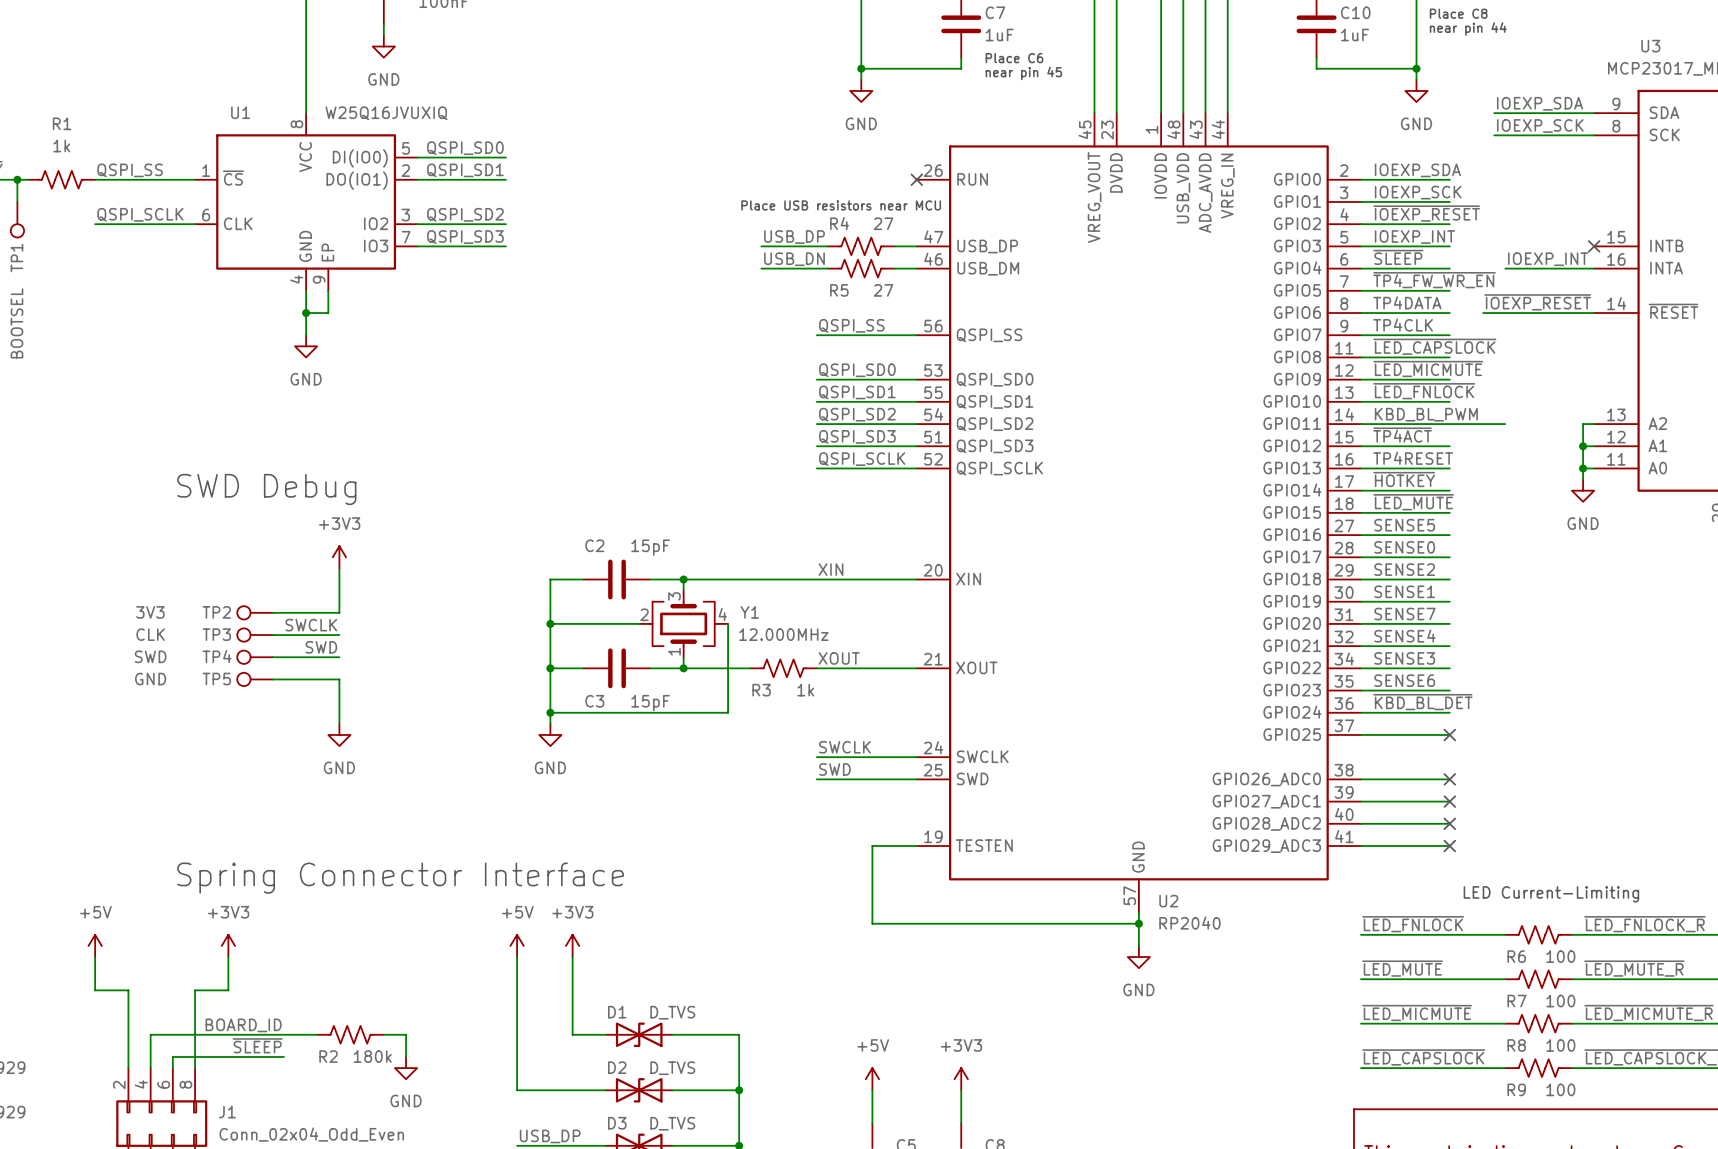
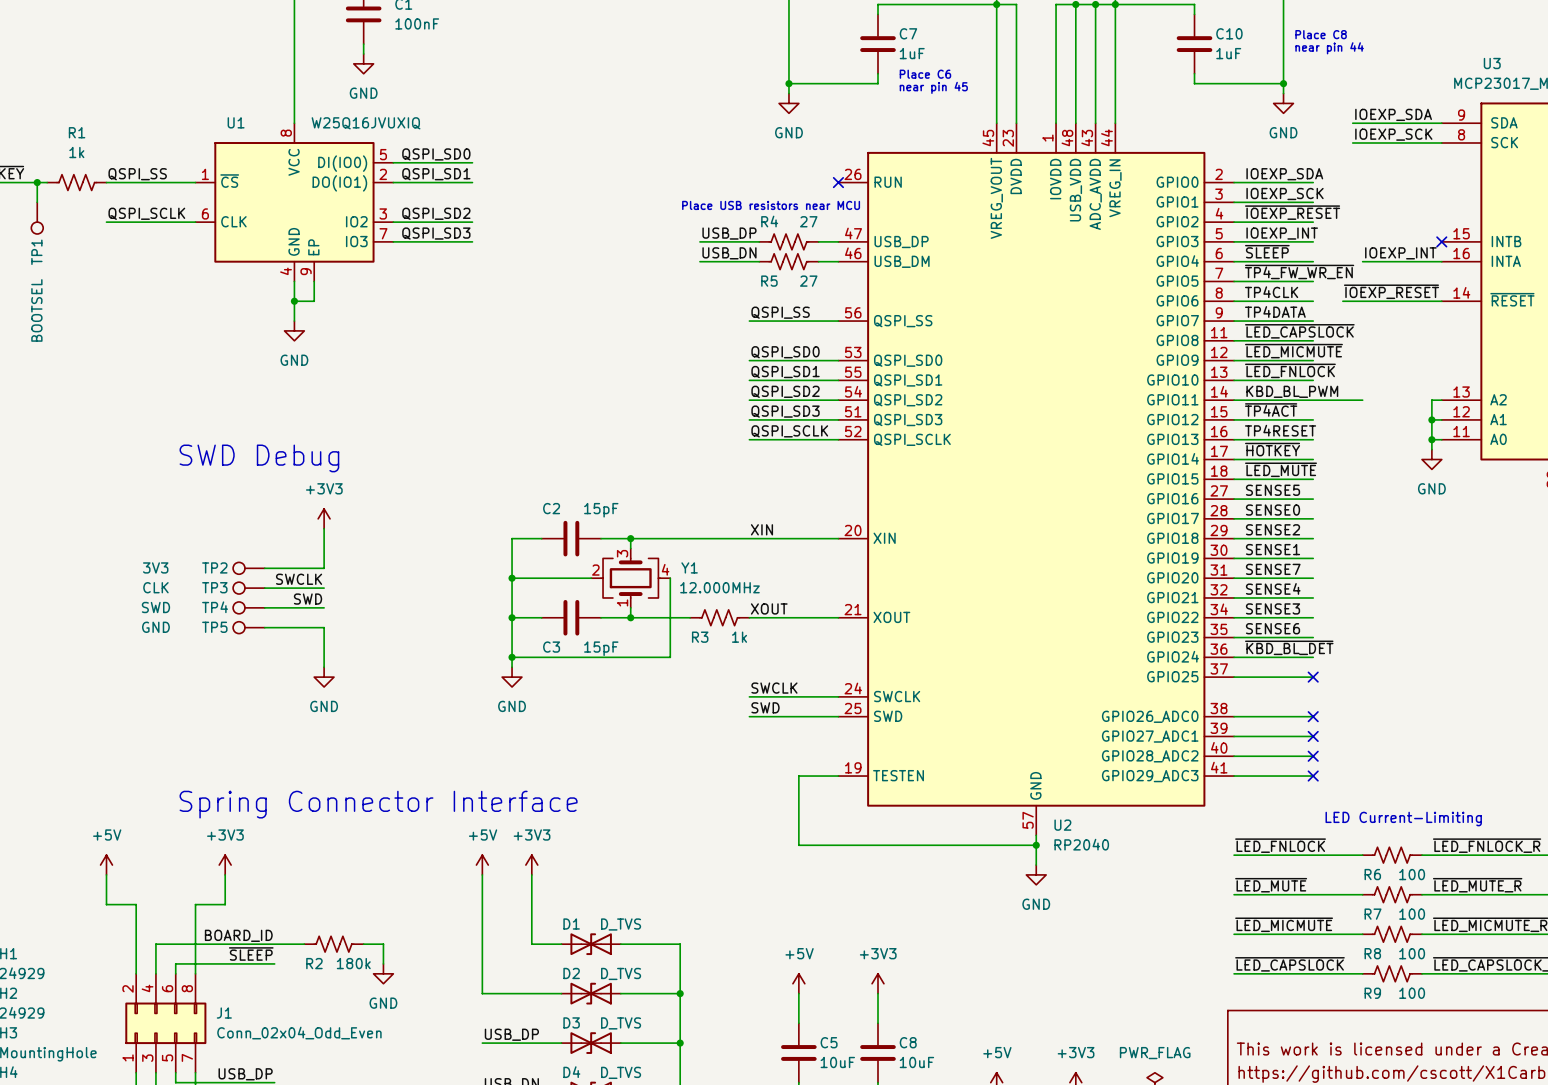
label: TP4DATA (1407, 302) -> TP4CLK (1271, 292)
label: TP4CLK (1403, 325) -> TP4DATA (1275, 311)

